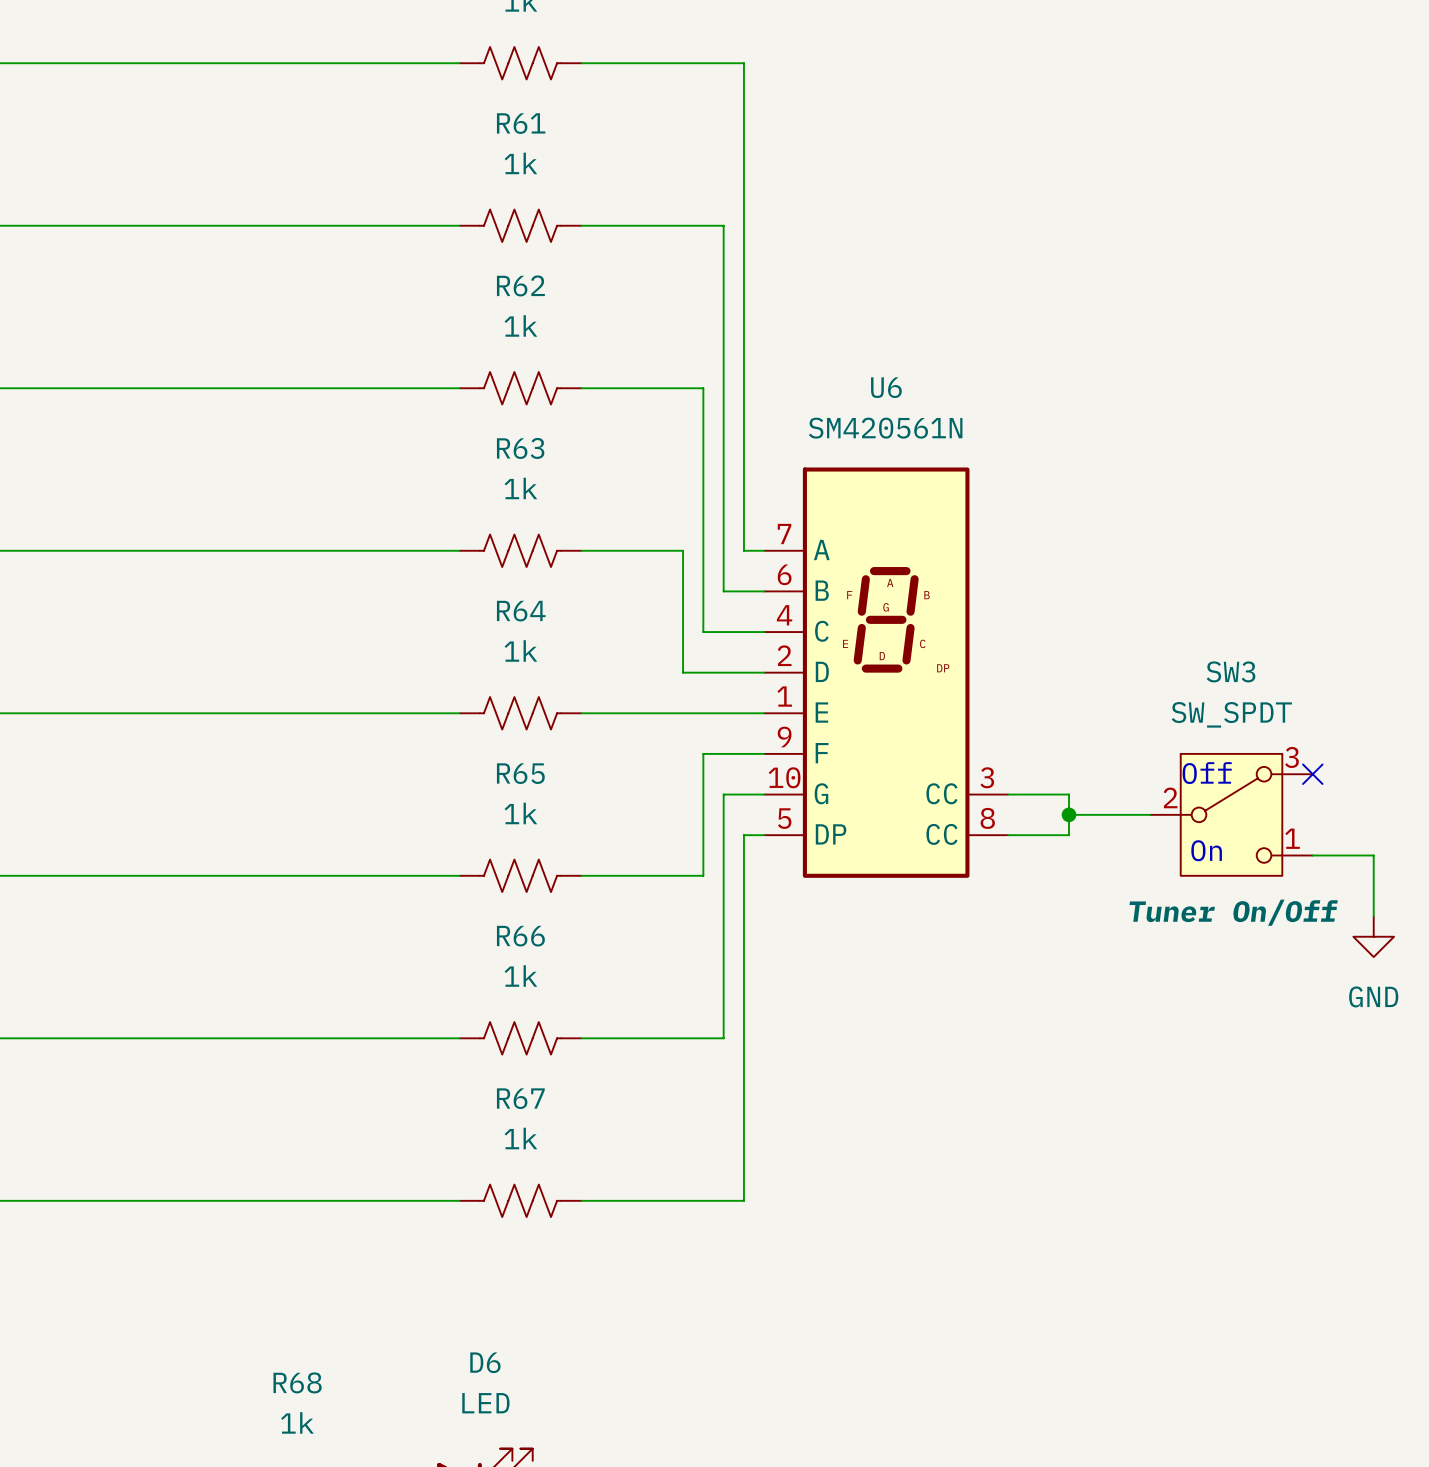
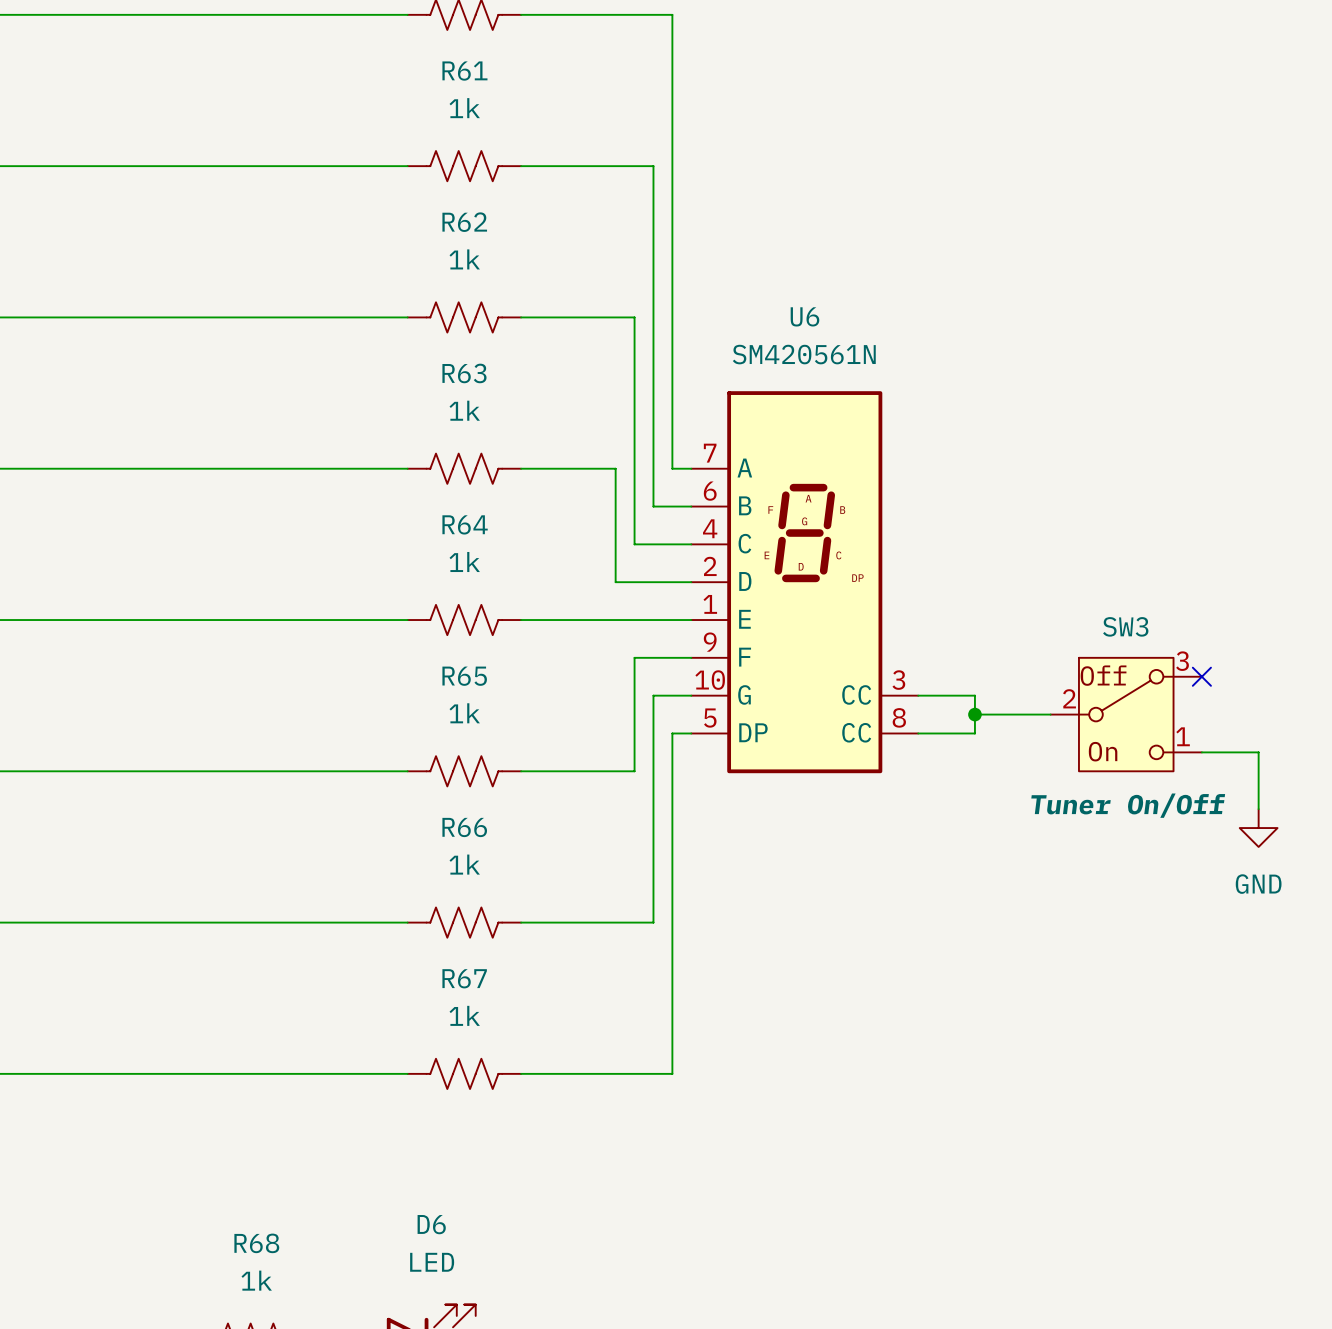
SW3 name position: SW3 (1230, 671) -> SW3 (1125, 626)
SW3 value: SW_SPDT (1231, 714) -> none
text: Off (1207, 773) -> none
SW3 text: none -> Off (1103, 675)
text: On (1206, 850) -> none
SW3 text: none -> On (1103, 751)

